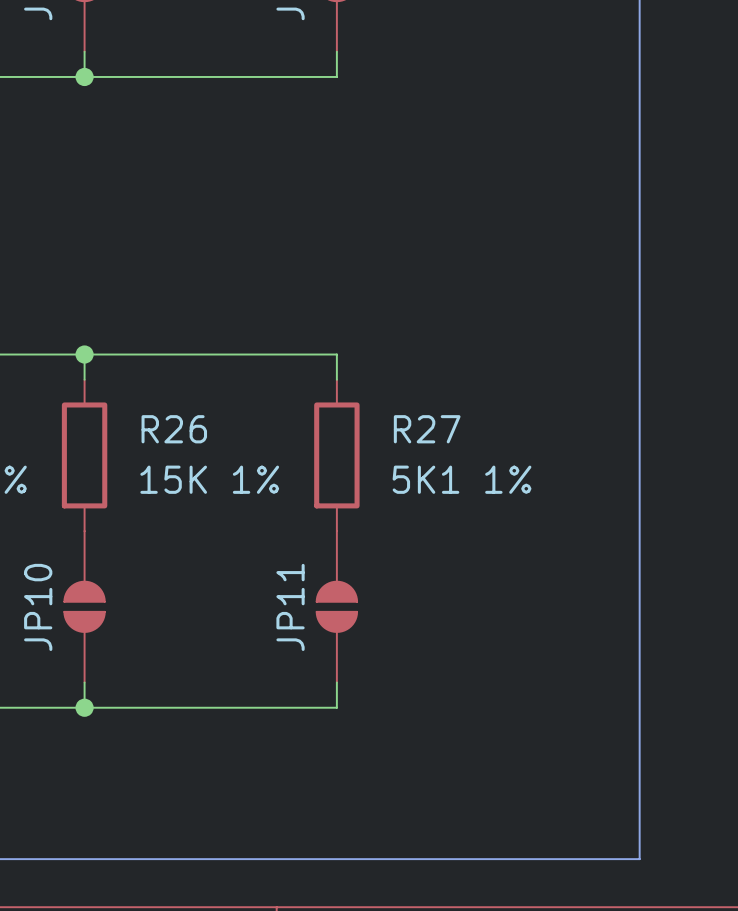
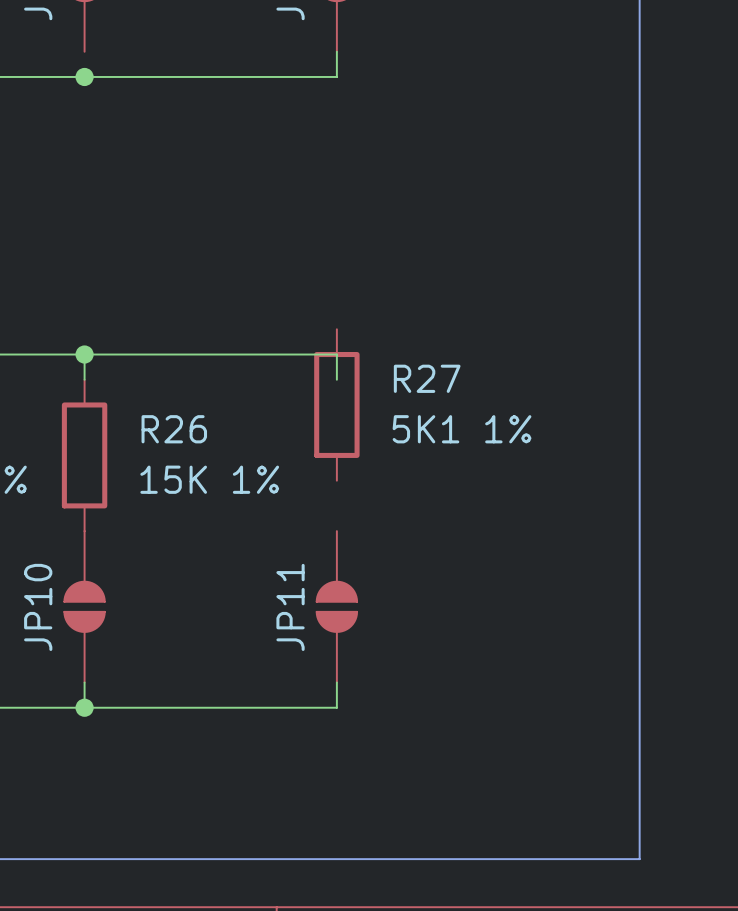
wire: (84, 51) (84, 76) -> none
R27 position: (336, 455) -> (336, 404)

